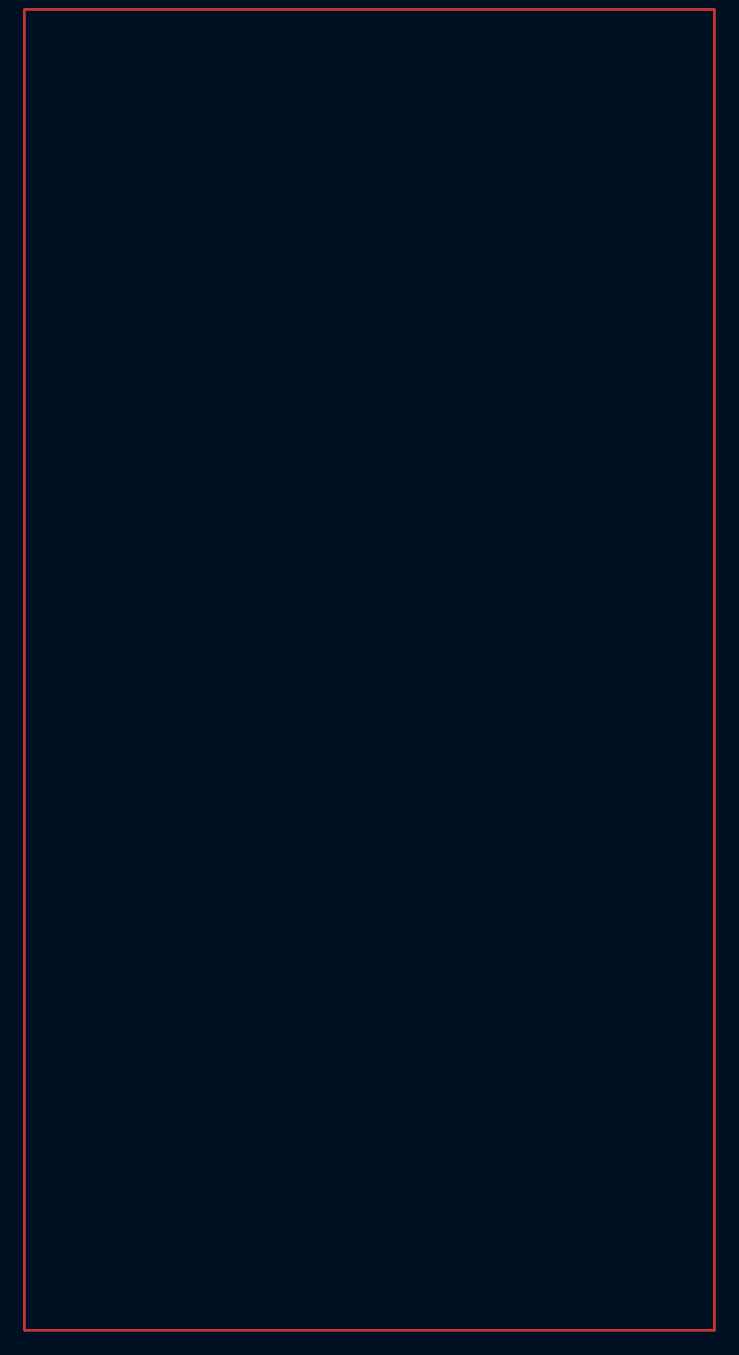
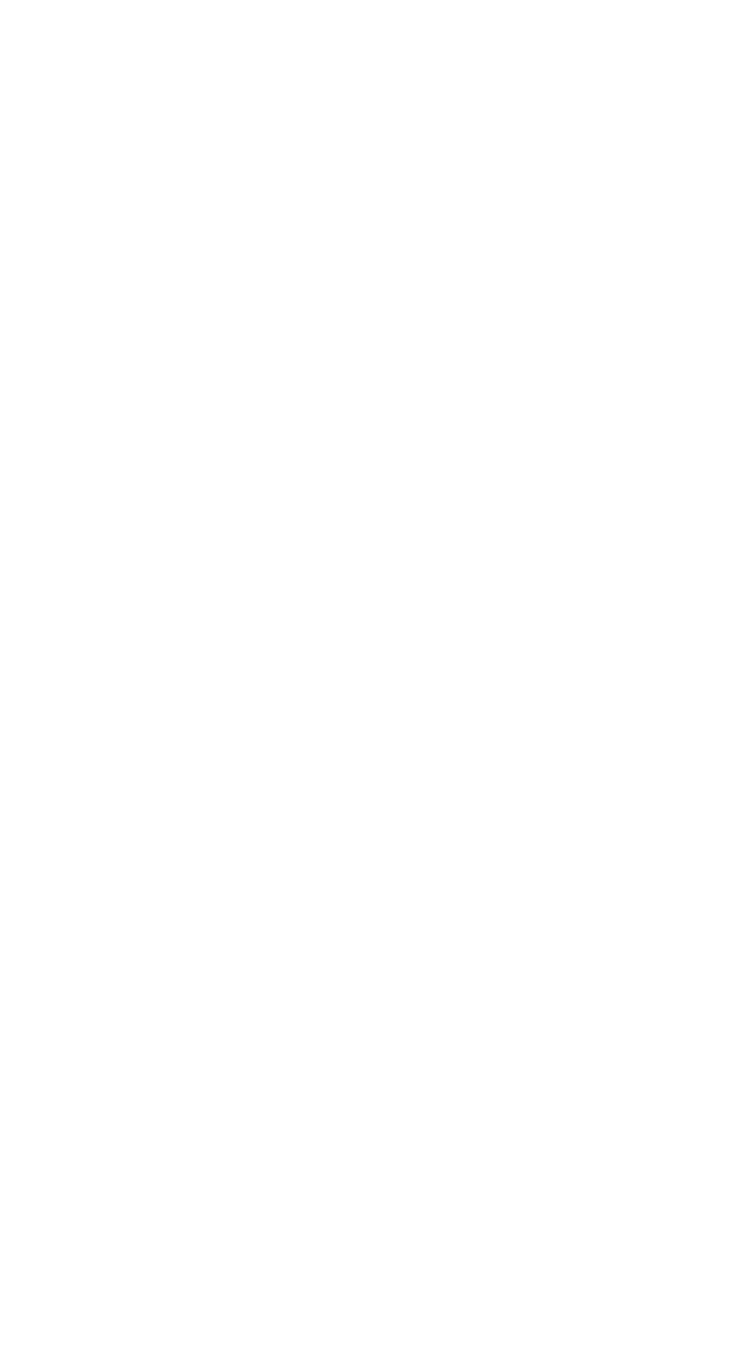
top track: (24, 9) (24, 1330) (714, 1330) (714, 9) (24, 9) -> none

